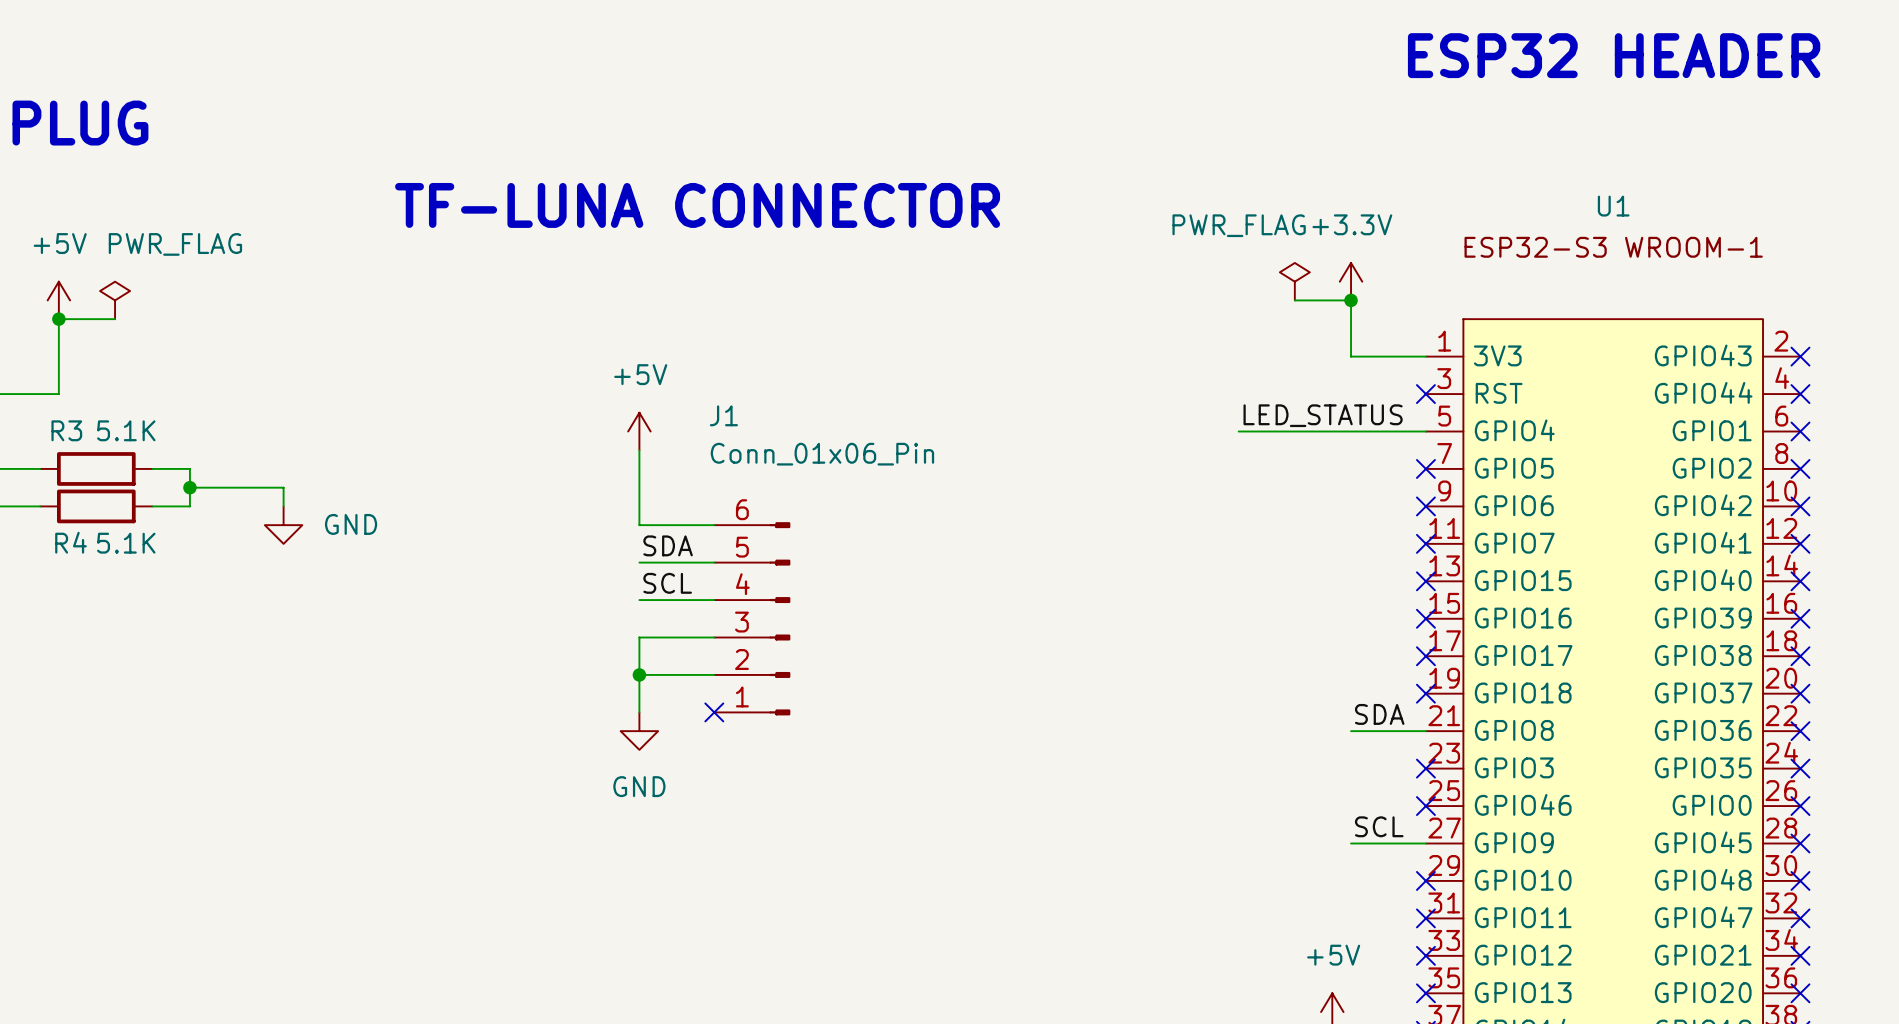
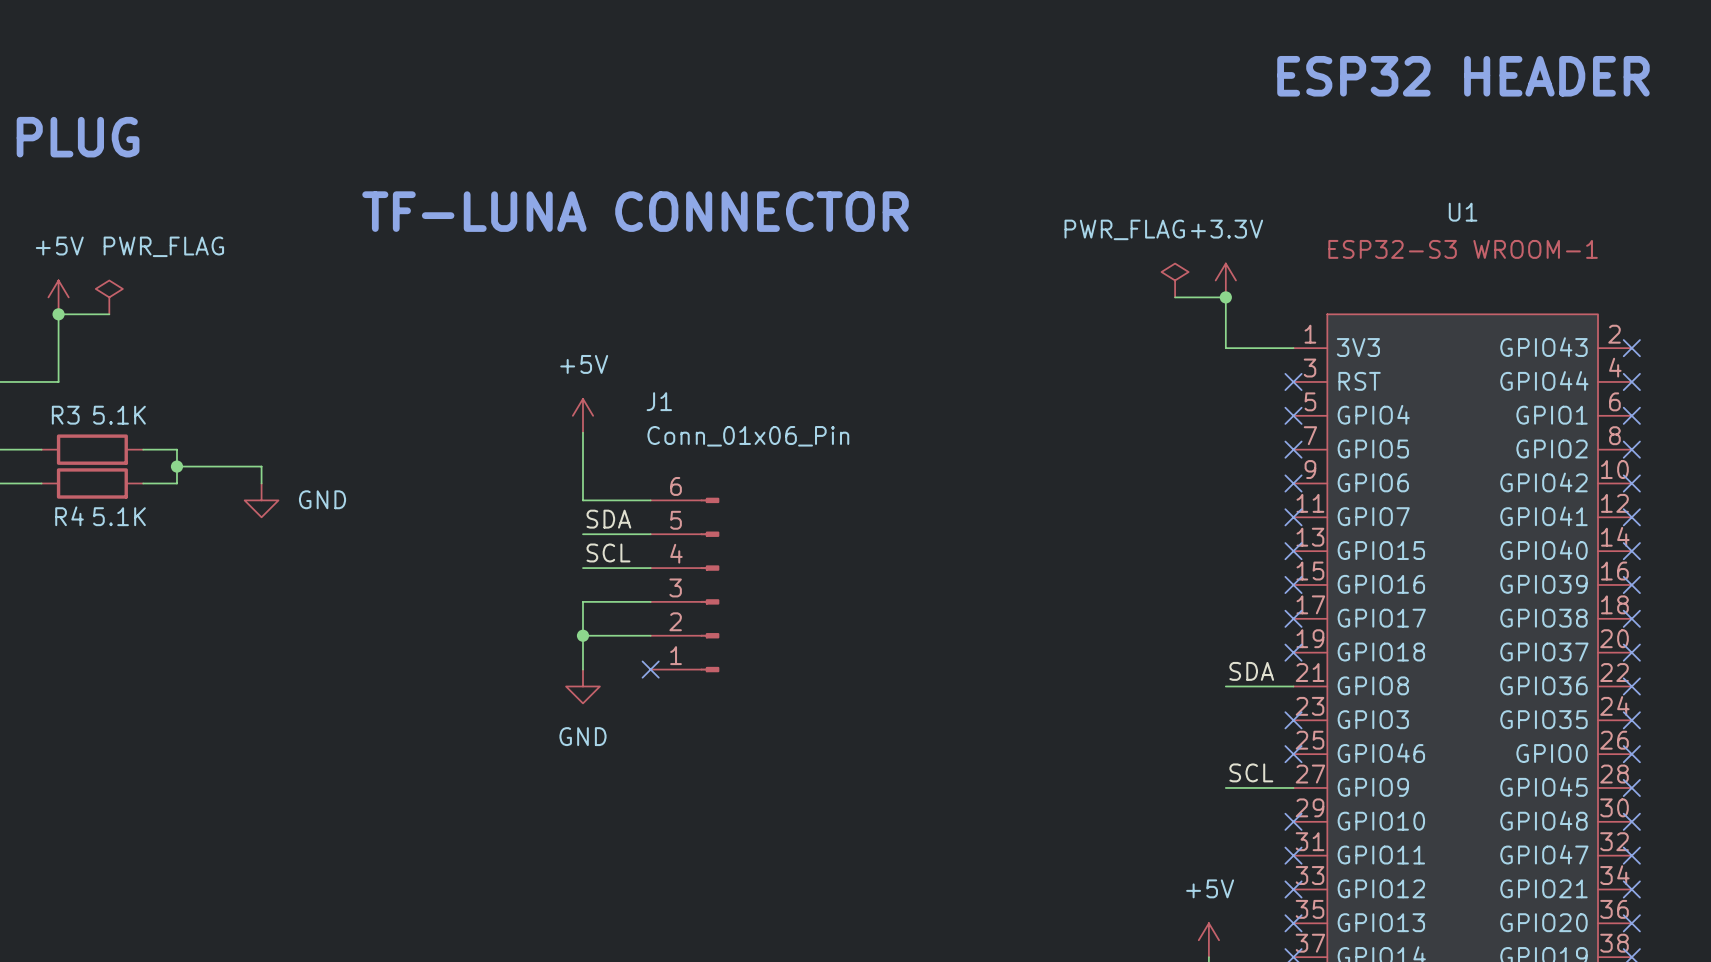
label: LED_STATUS (1323, 415) -> none
wire: (1238, 431) (1425, 431) -> none
no-connect mark: none -> (1293, 415)

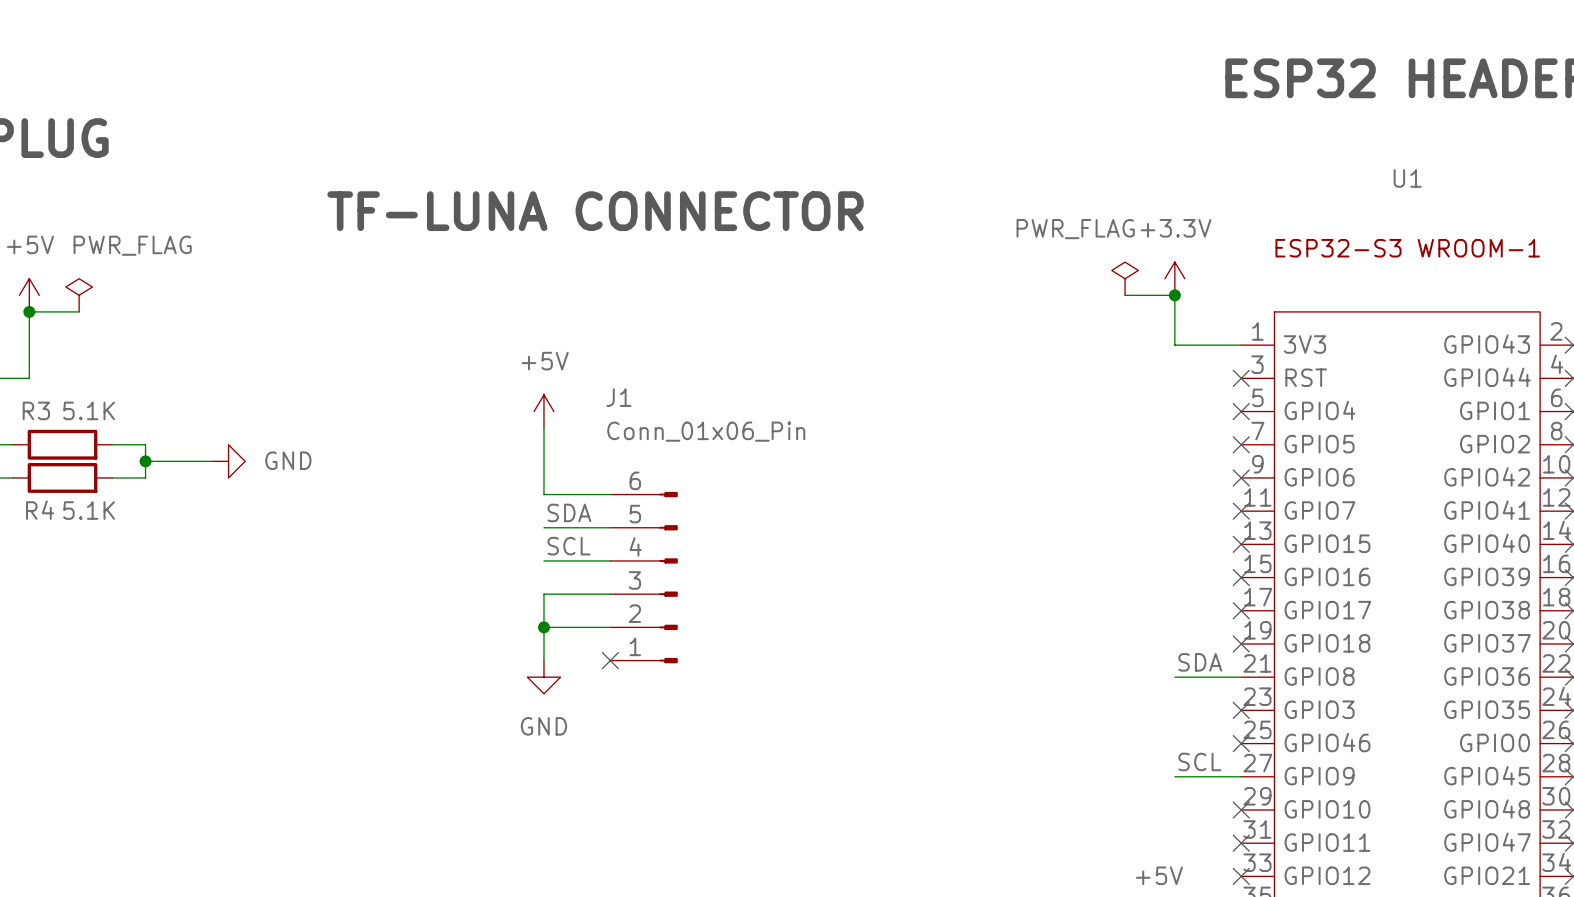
U1 name position: U1 (1463, 212) -> U1 (1407, 178)
power symbol rotation: 0° (261, 500) -> 90° counterclockwise (228, 461)
power symbol position: GND (261, 500) -> GND (228, 461)

